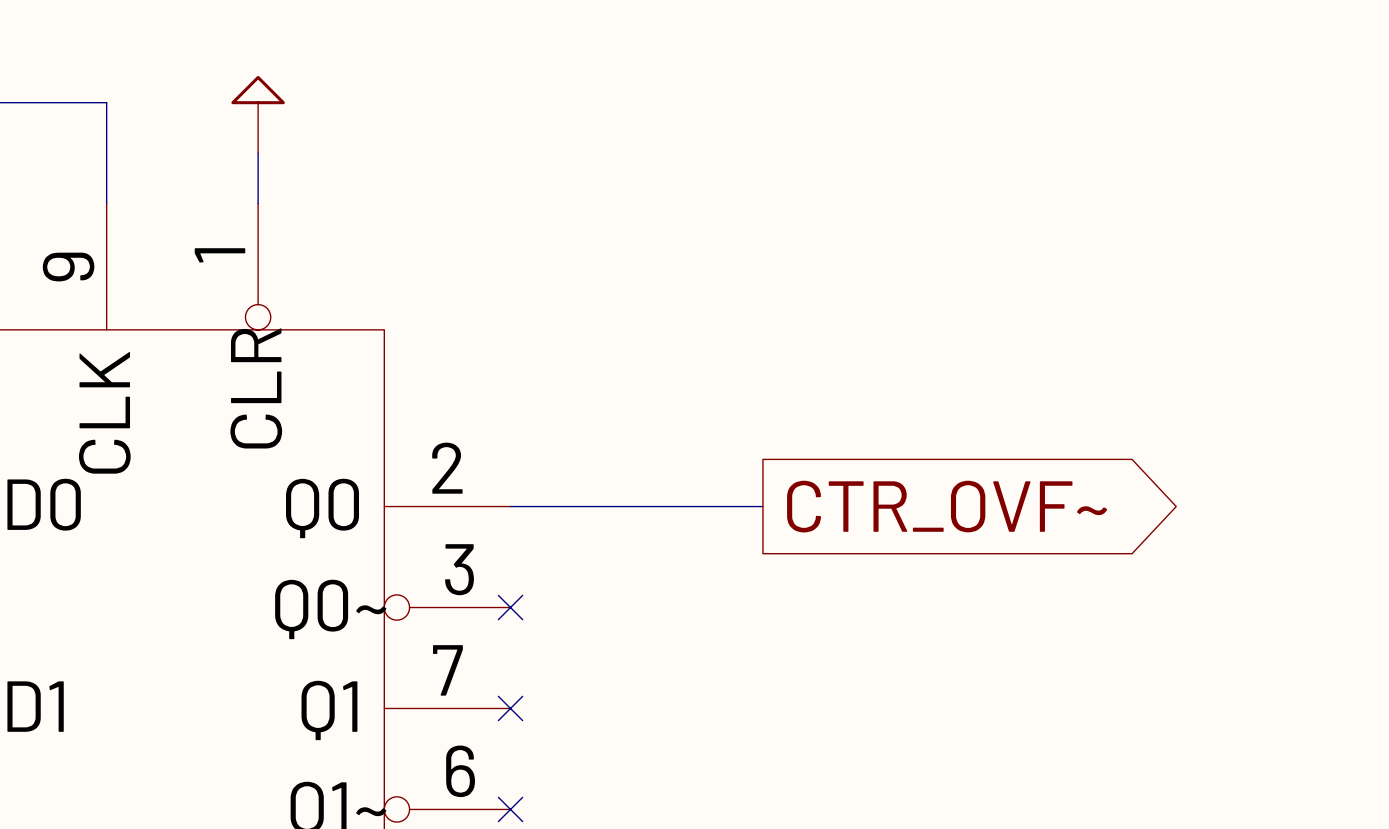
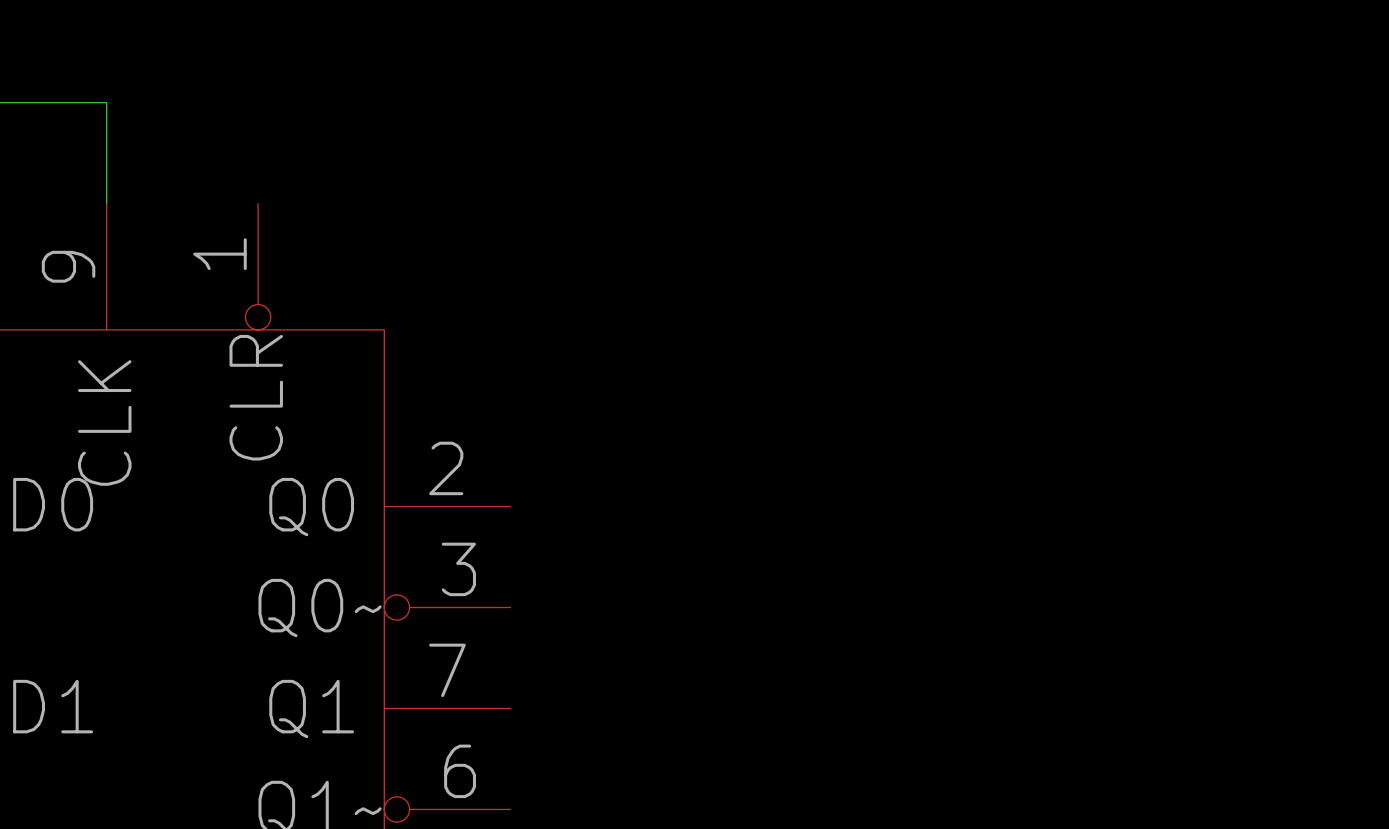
power symbol: (258, 114) -> none
wire: (258, 153) (258, 203) -> none
wire: (510, 506) (762, 506) -> none
global label: CTR_OVF~ (947, 506) -> none
no-connect mark: (510, 607) -> none
no-connect mark: (510, 708) -> none
no-connect mark: (510, 809) -> none

